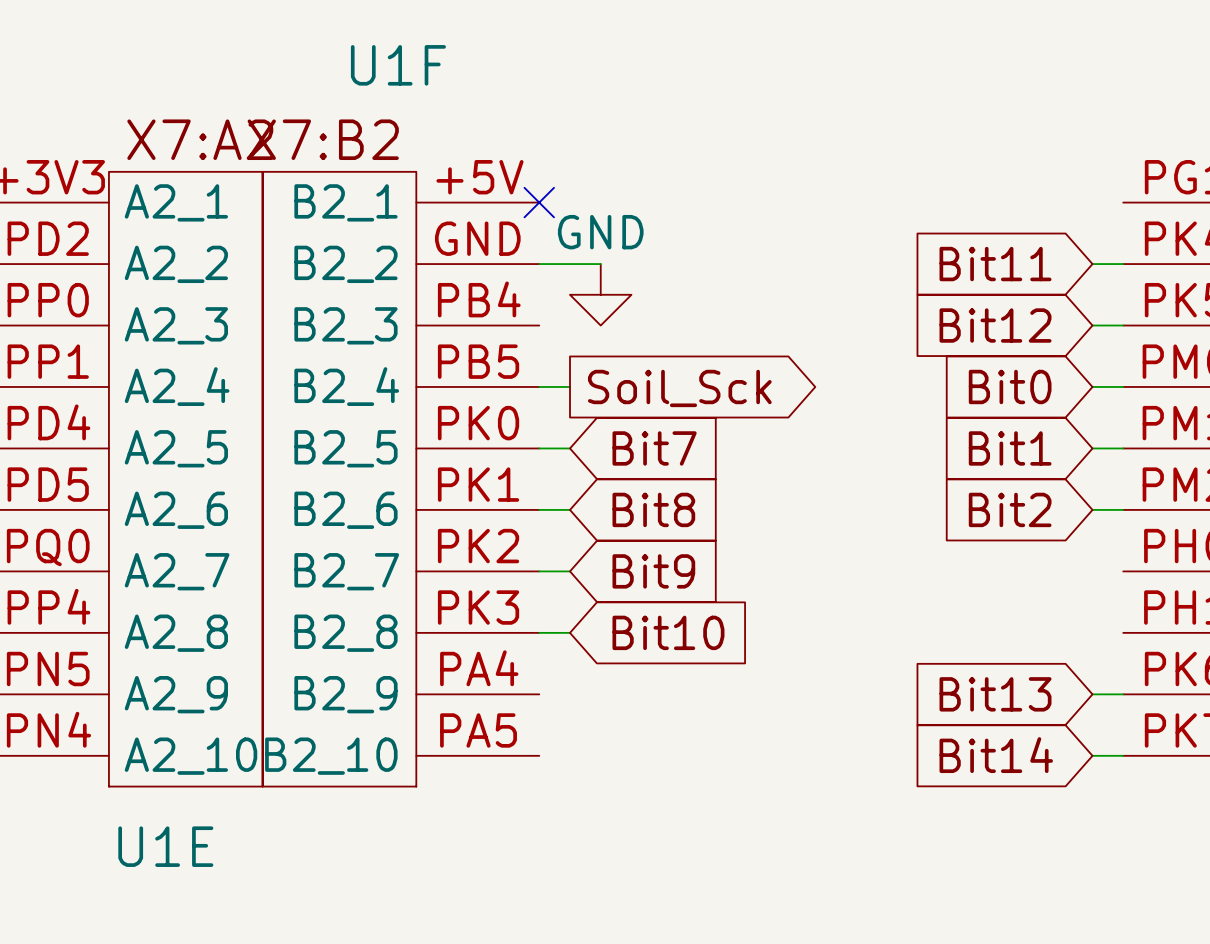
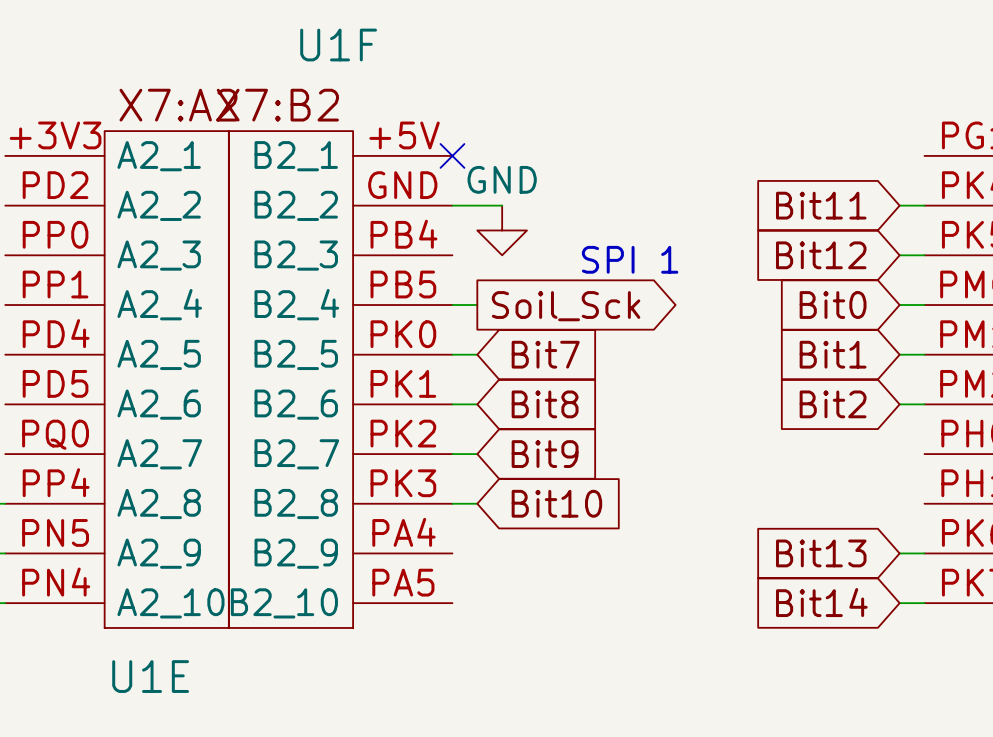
text: none -> SPI 1 (630, 259)

